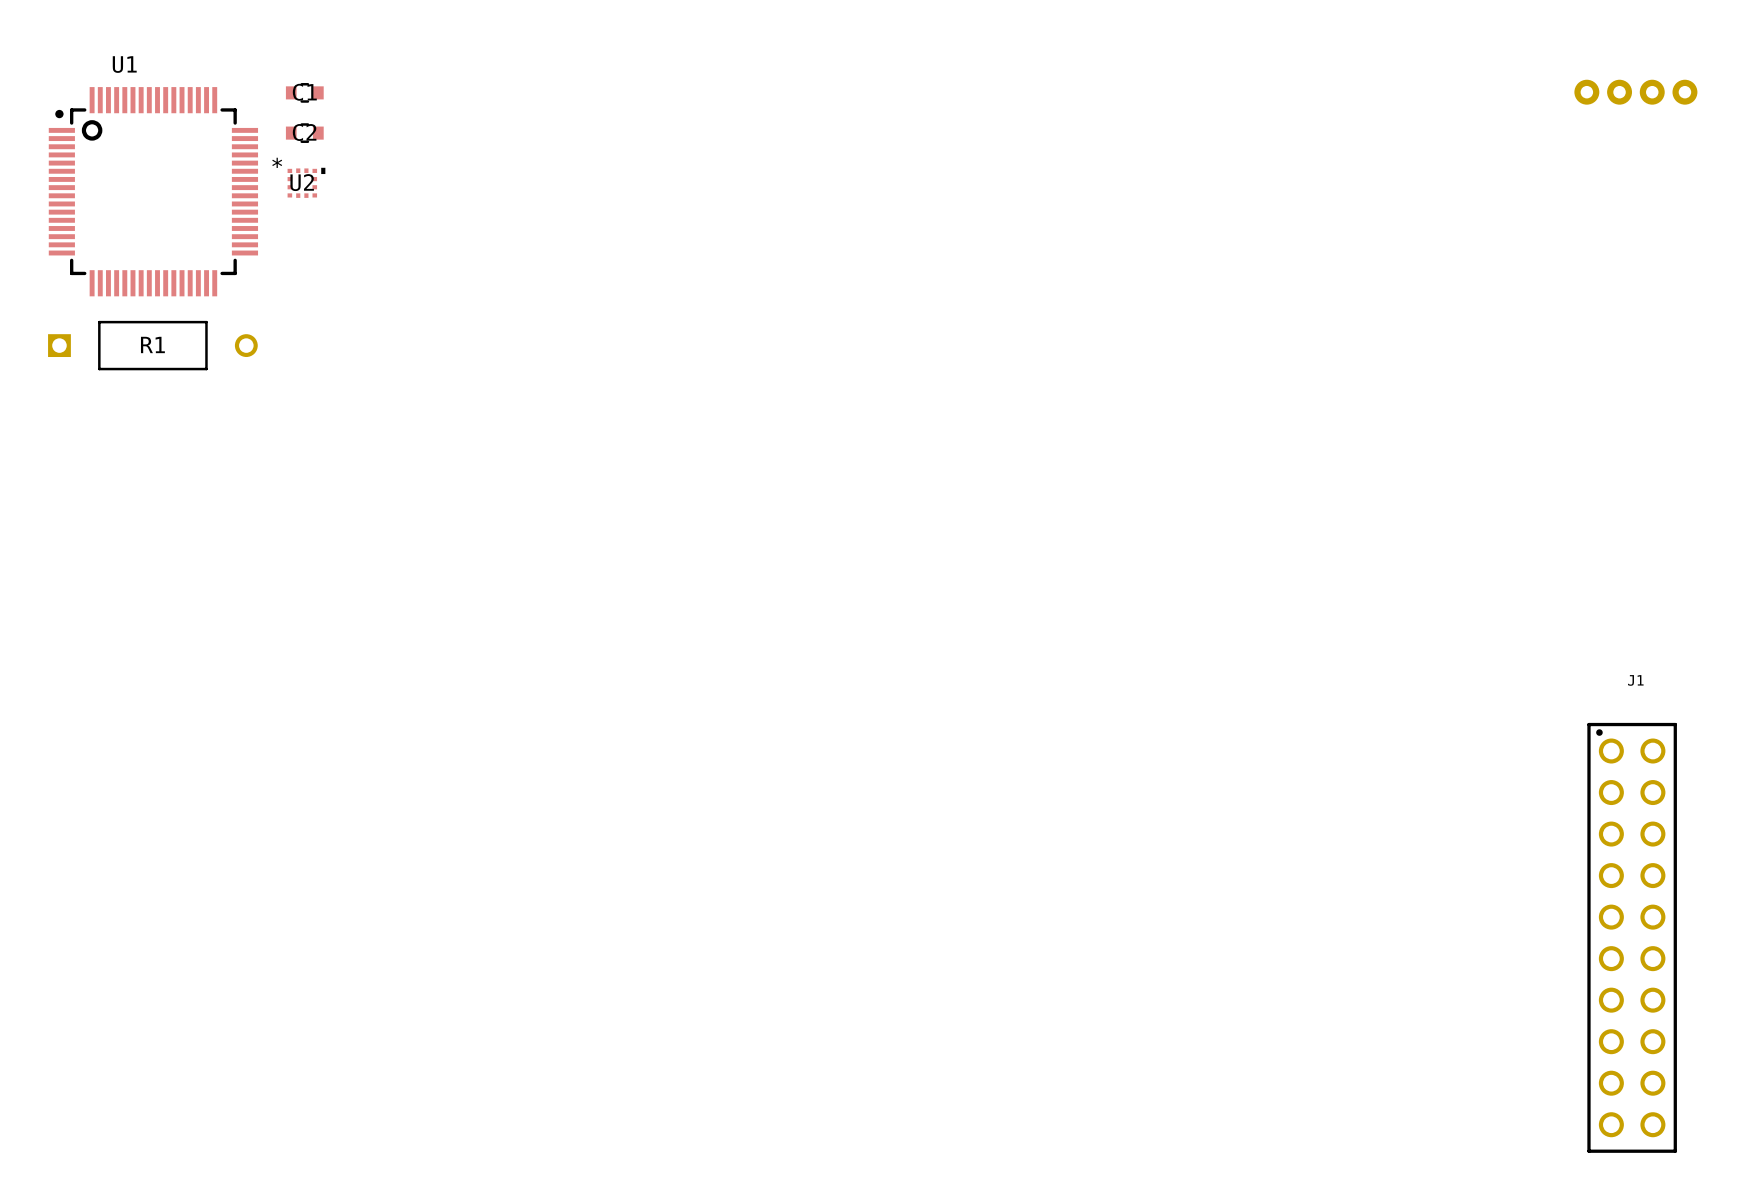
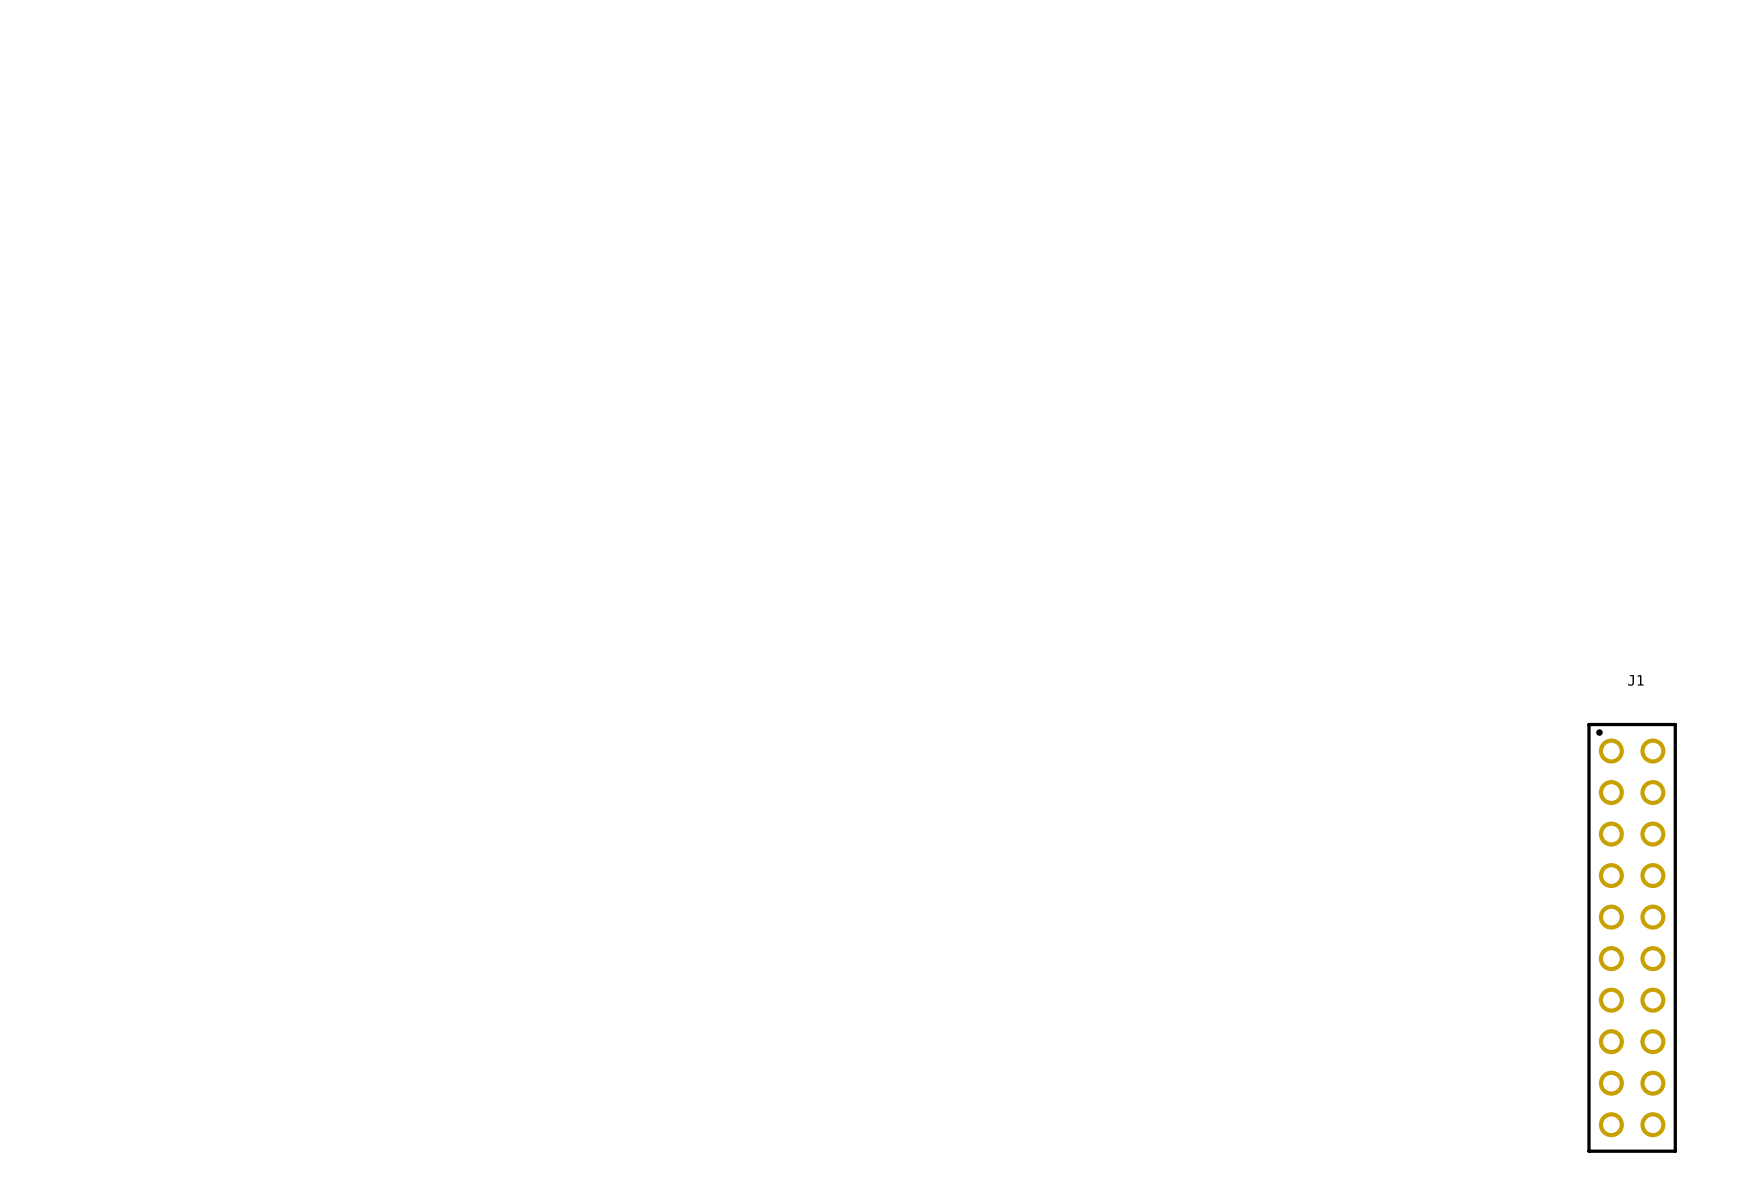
C1: (304, 92) -> none
part: (1635, 92) -> none
C2: (304, 133) -> none
U2: (306, 182) -> none
U1: (153, 191) -> none
R1: (152, 345) -> none

